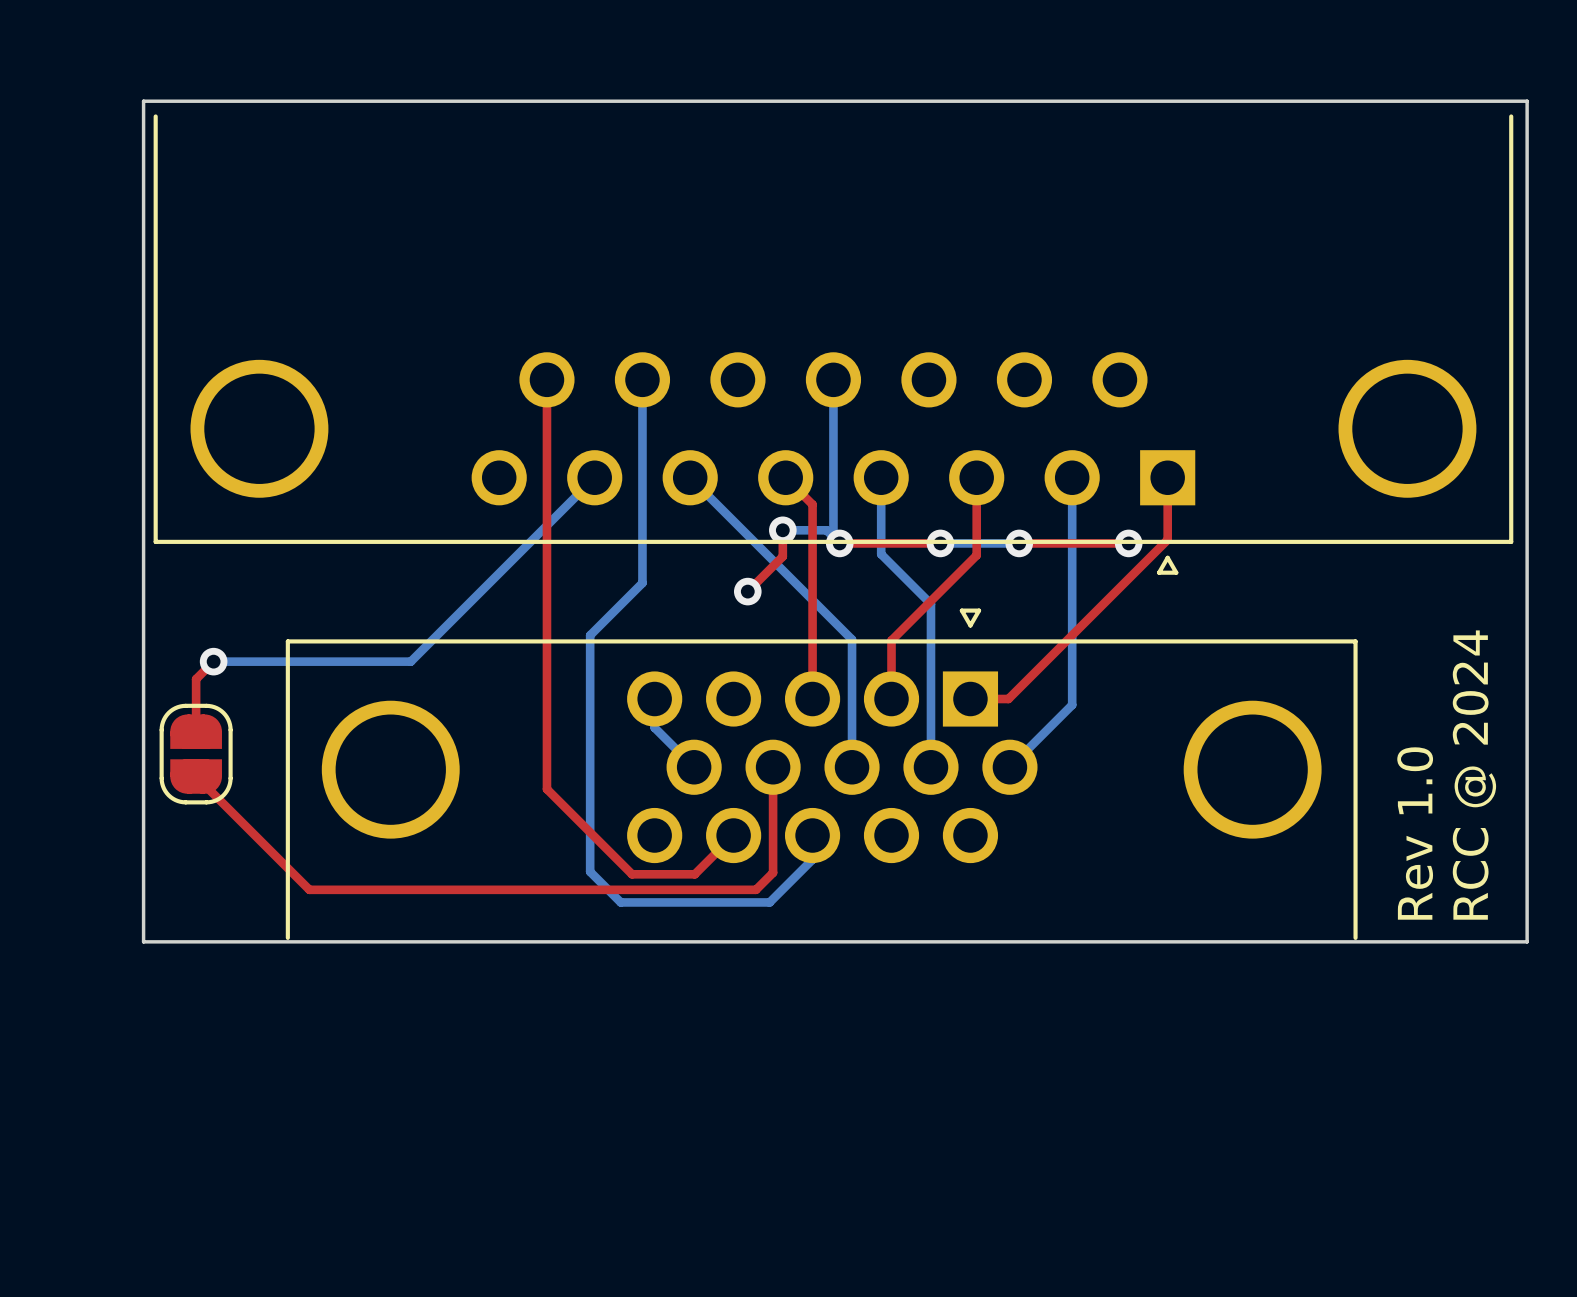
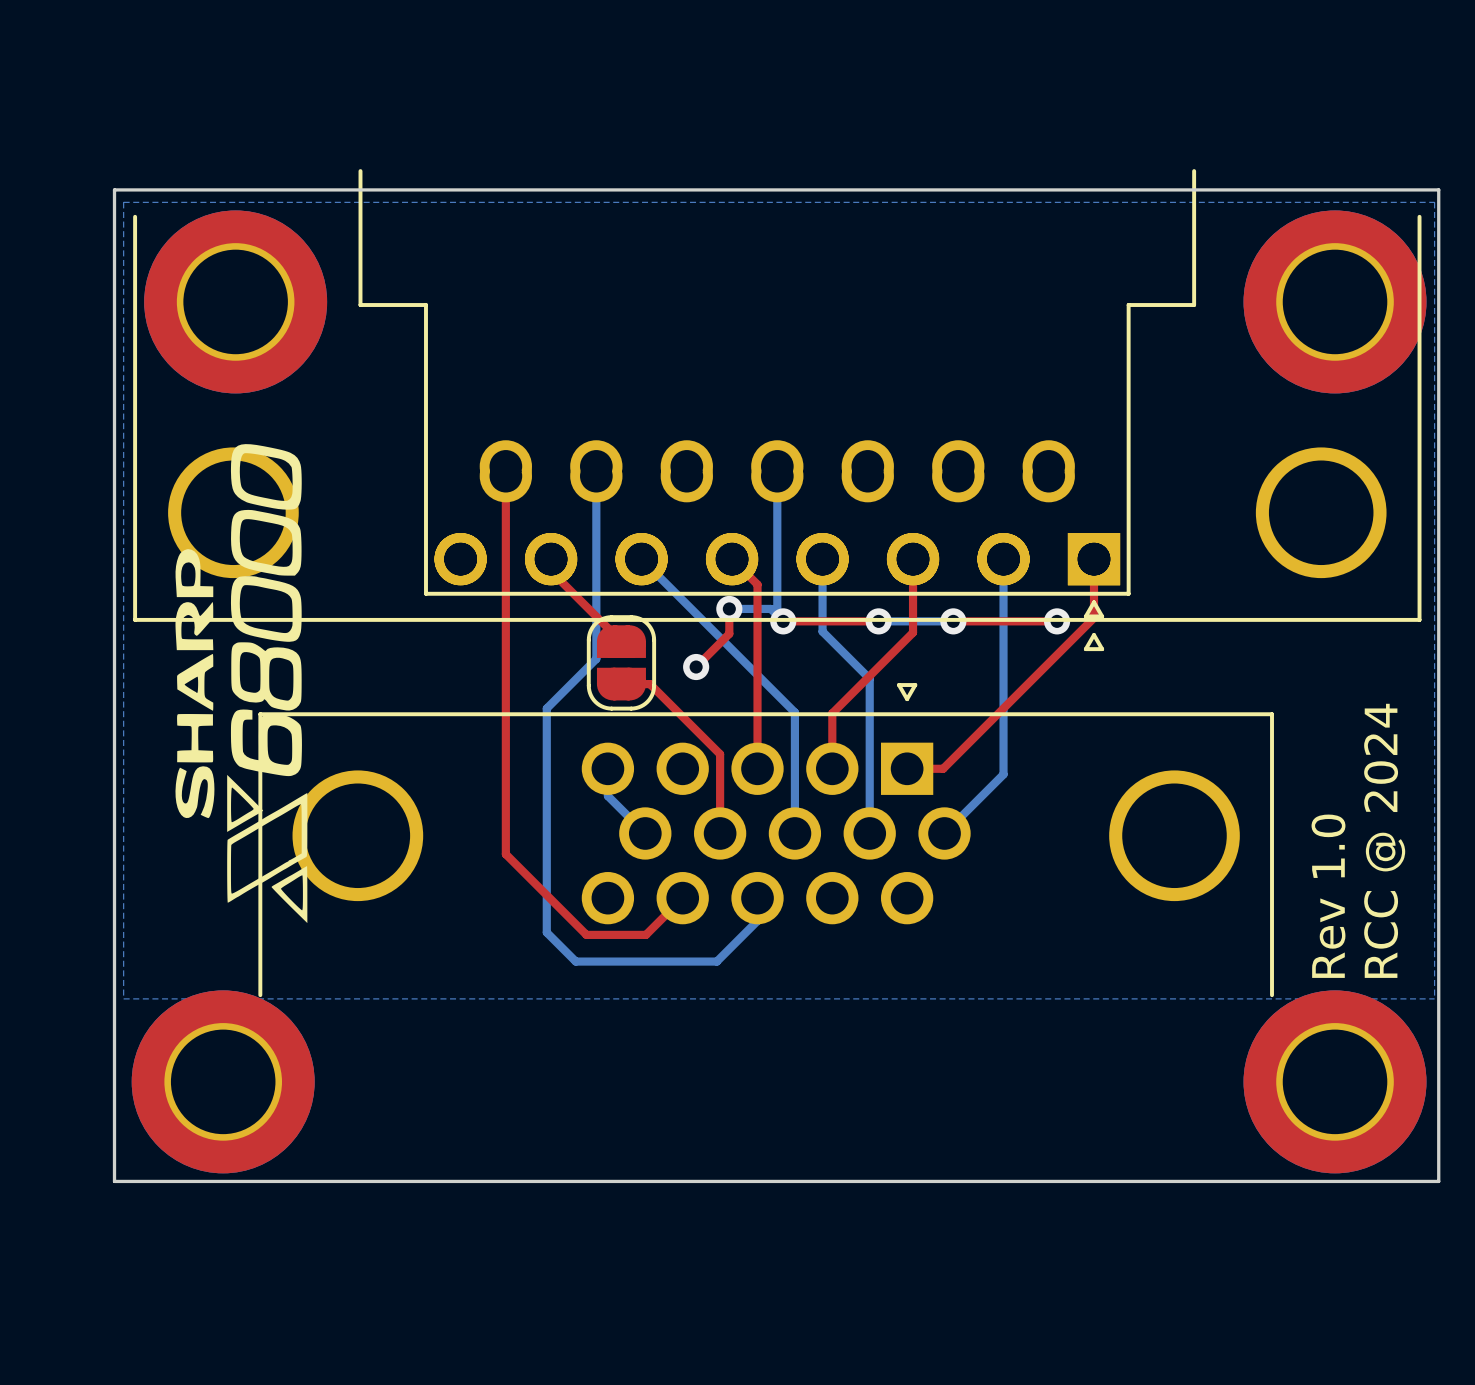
board edge: (143, 101) (1527, 101) (1527, 941) (143, 941) (143, 101) -> (114, 189) (114, 1181) (1438, 1181) (1438, 189) (114, 189)
part: none -> (235, 301)
part: none -> (1335, 301)
part: none -> (777, 393)
drawing: none -> [175, 444, 308, 924]
bottom track: (594, 477) (410, 661) (213, 661) -> none
top track: none -> (551, 571) (621, 641)
top track: (213, 661) (196, 679) (196, 731) -> none
via: (213, 661) -> none
part position: (196, 754) -> (621, 662)
top track: (773, 767) (773, 872) (756, 889) (309, 889) (196, 776) -> (720, 833) (720, 754) (649, 684) (621, 684)
part: none -> (223, 1081)
part: none -> (1335, 1081)

